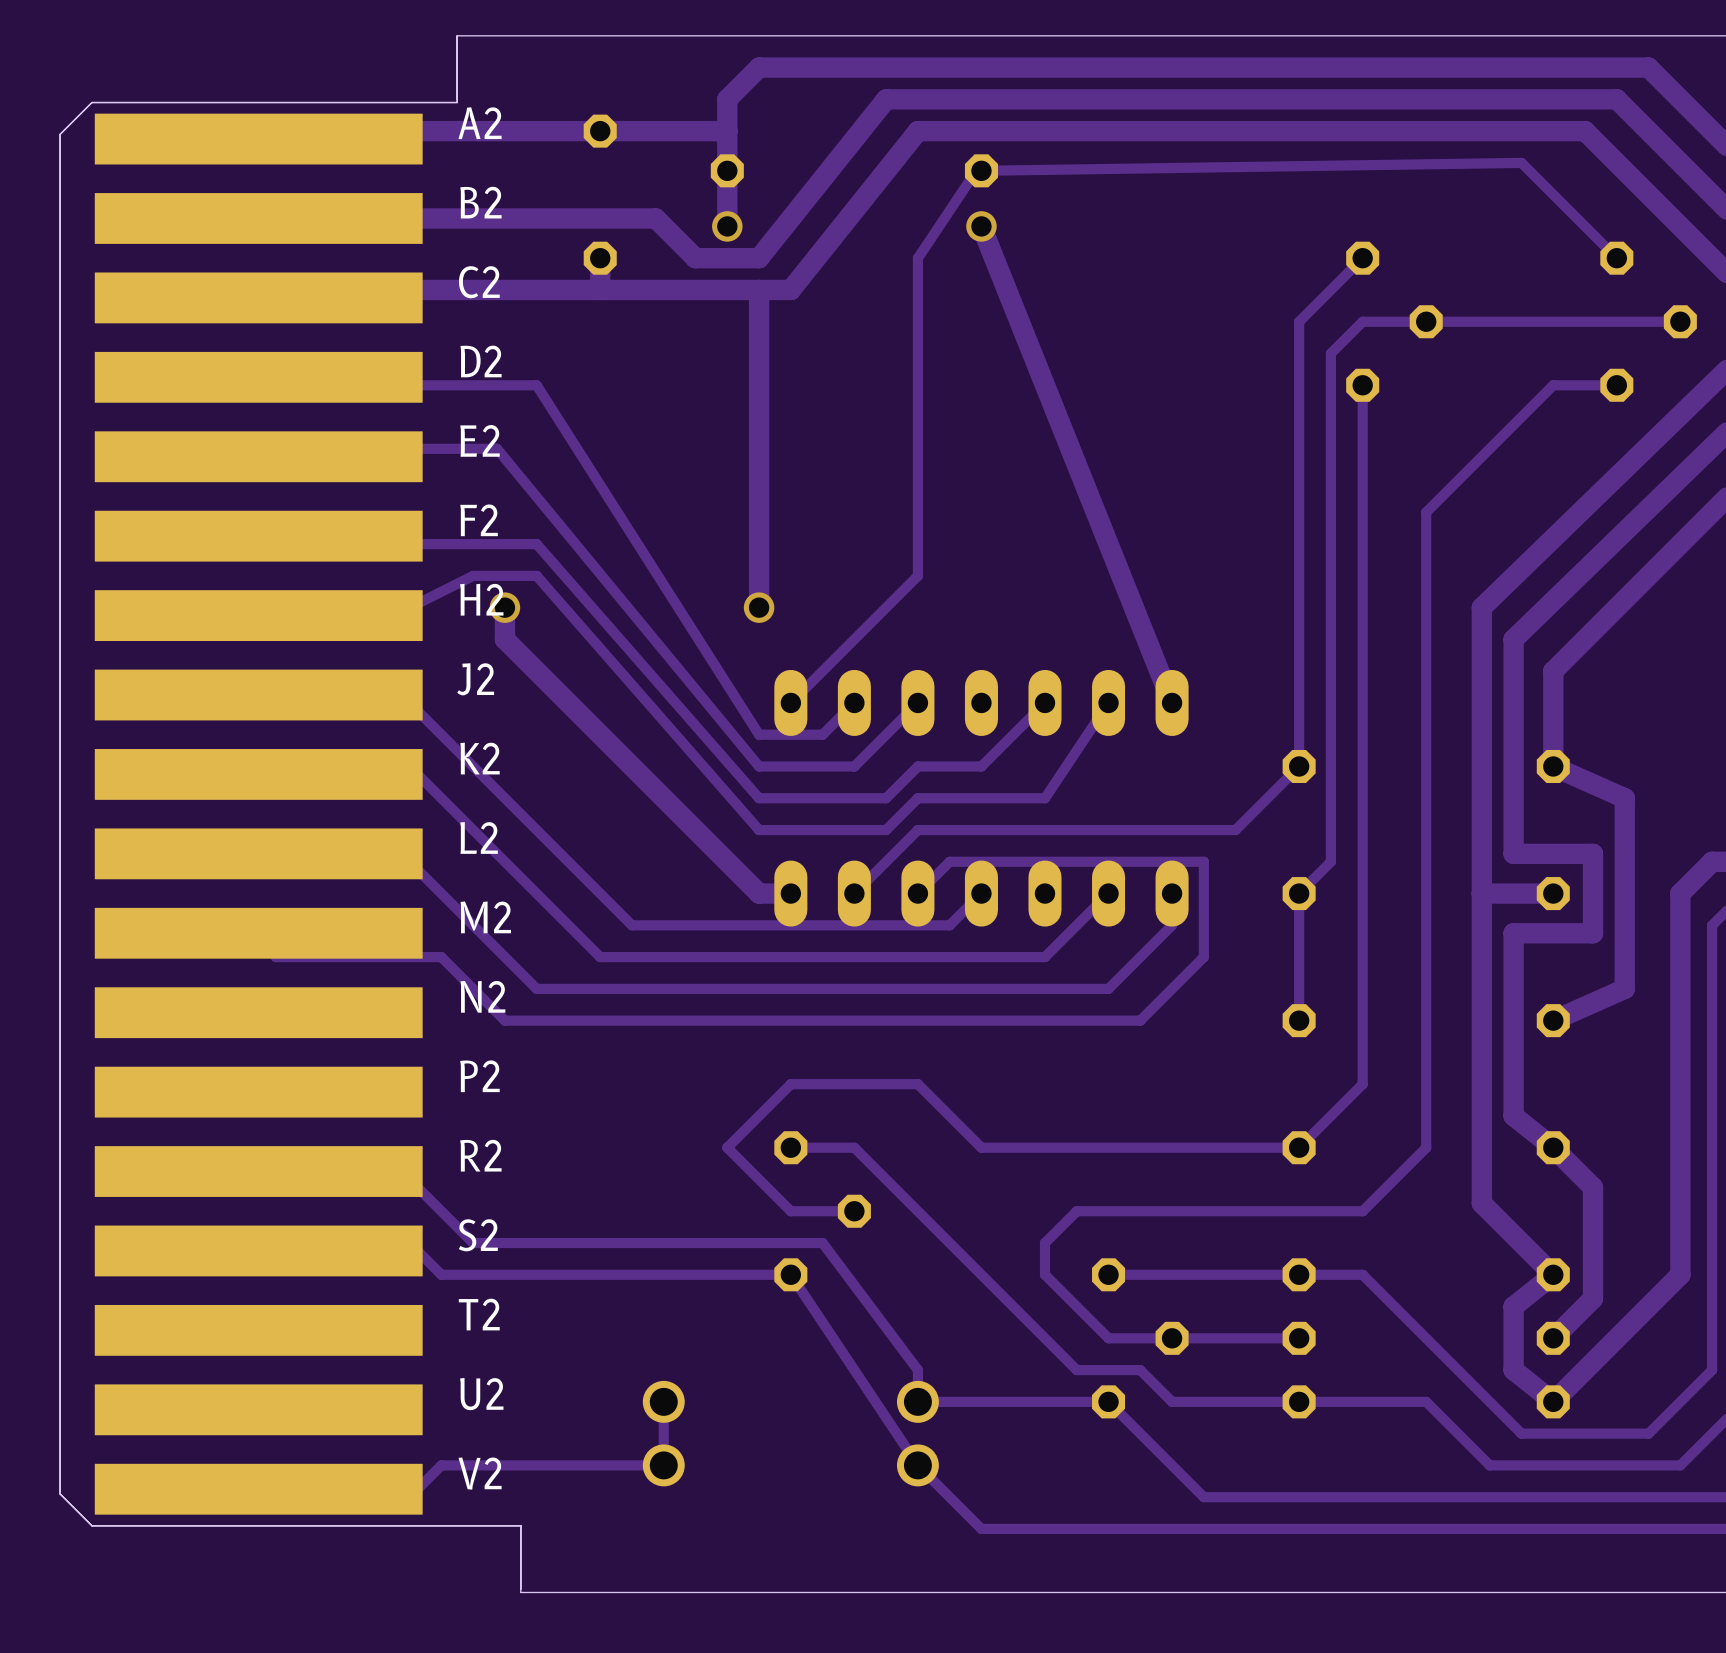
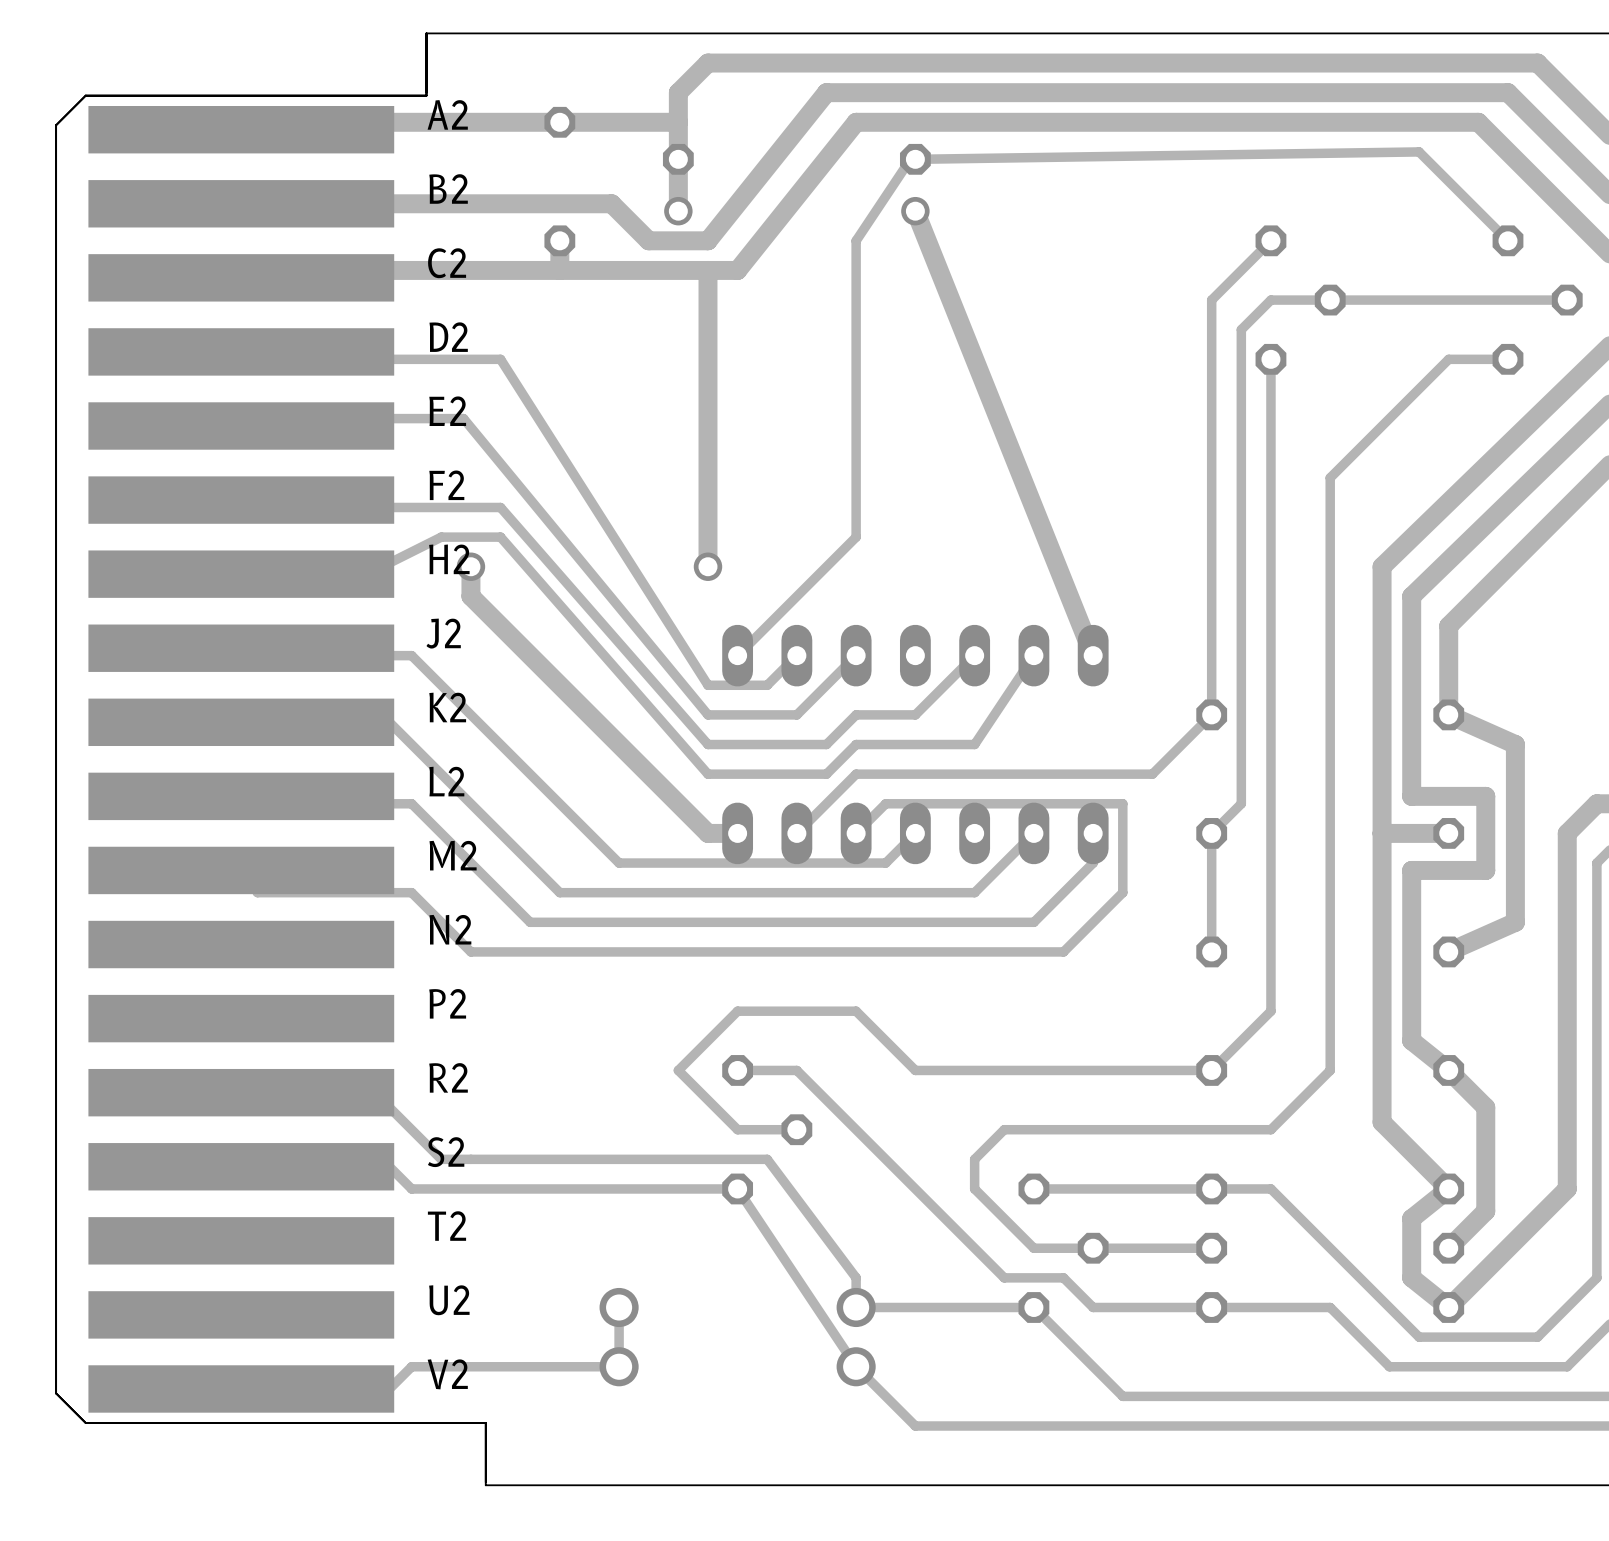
track: (409, 702) (632, 925) (663, 925) -> (382, 655) (411, 655) (619, 863)
track: (409, 861) (536, 988) (568, 988) -> (382, 803) (411, 803) (530, 922)

